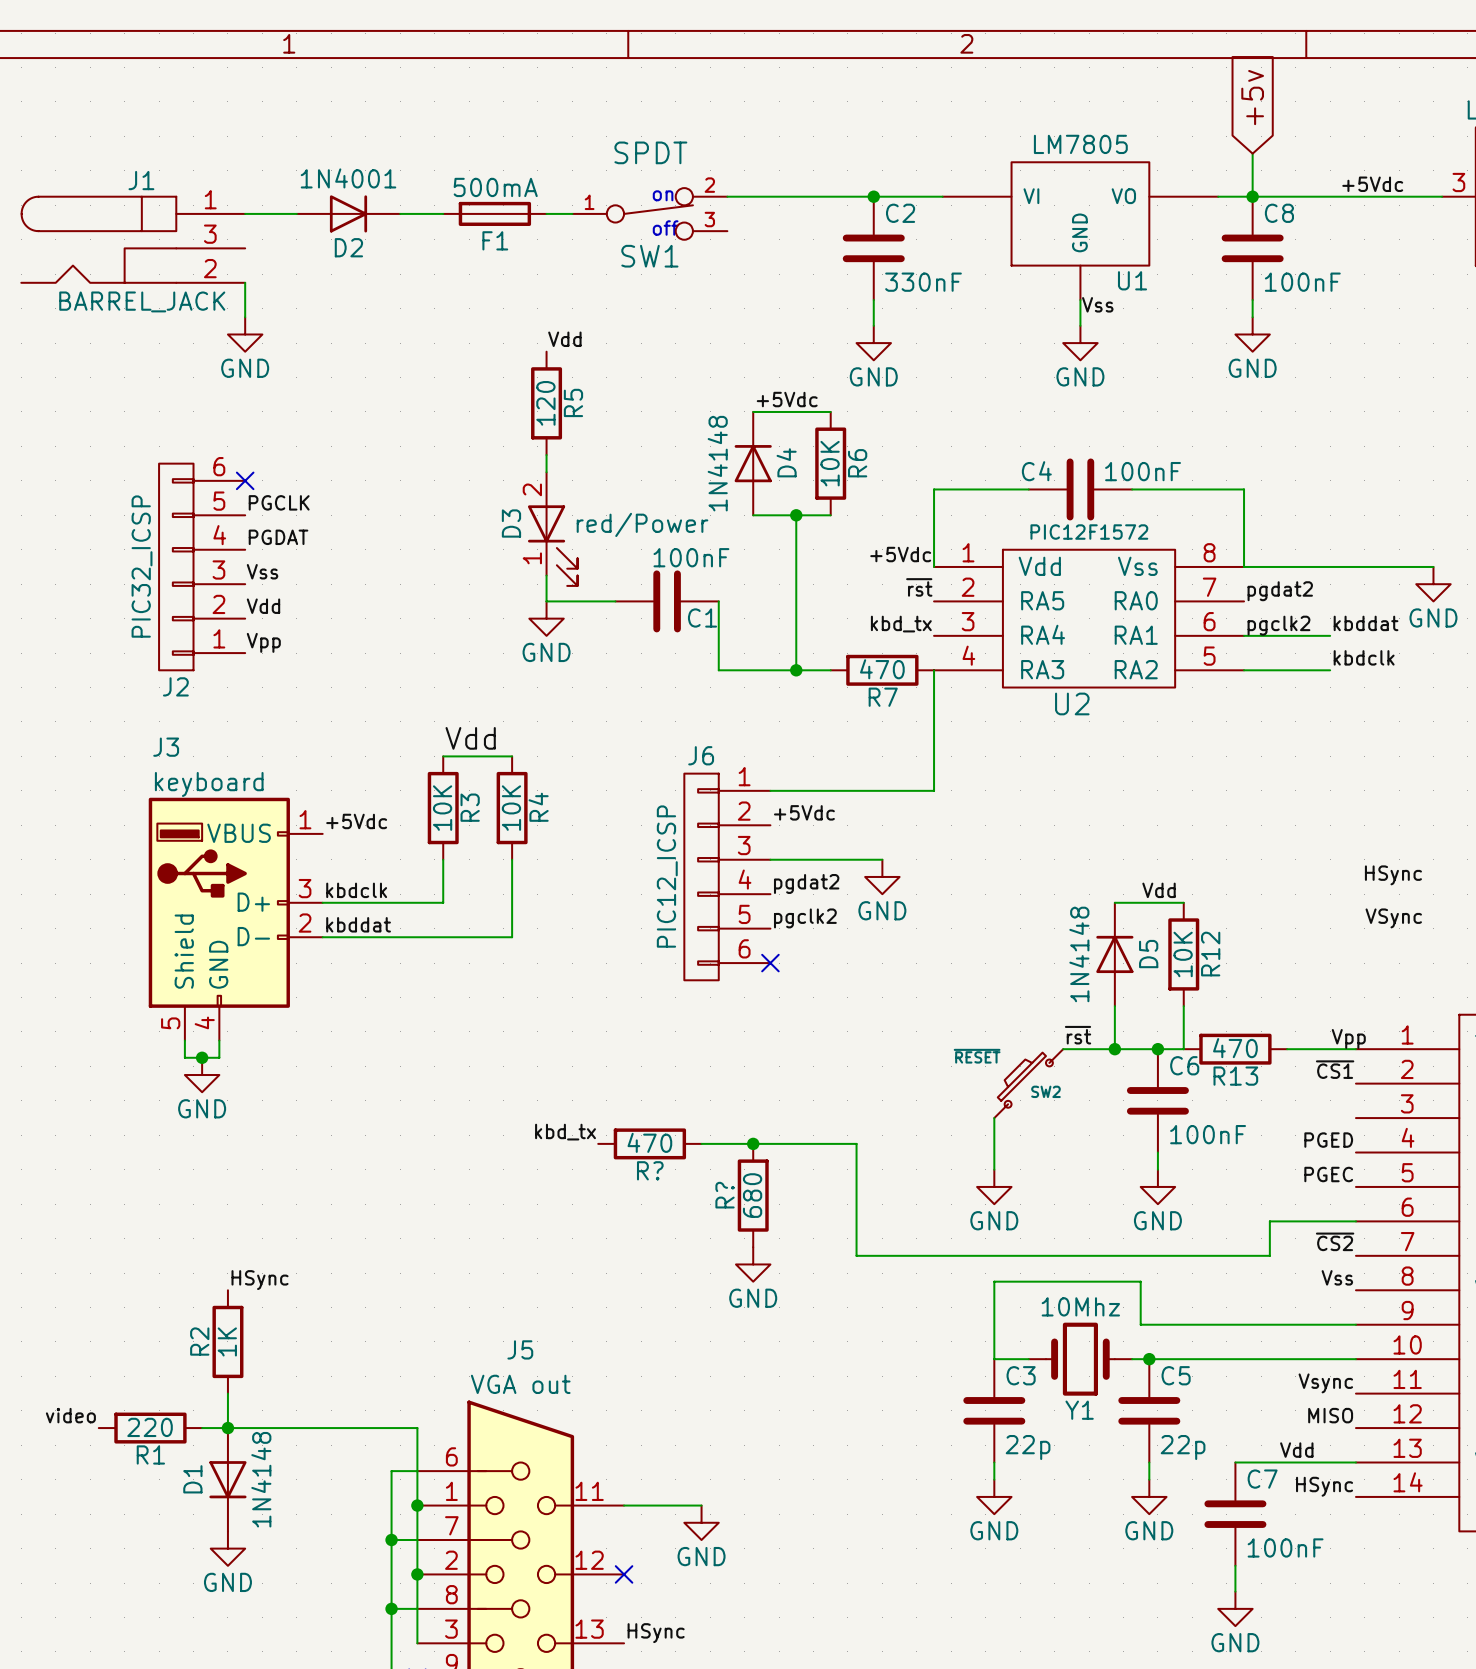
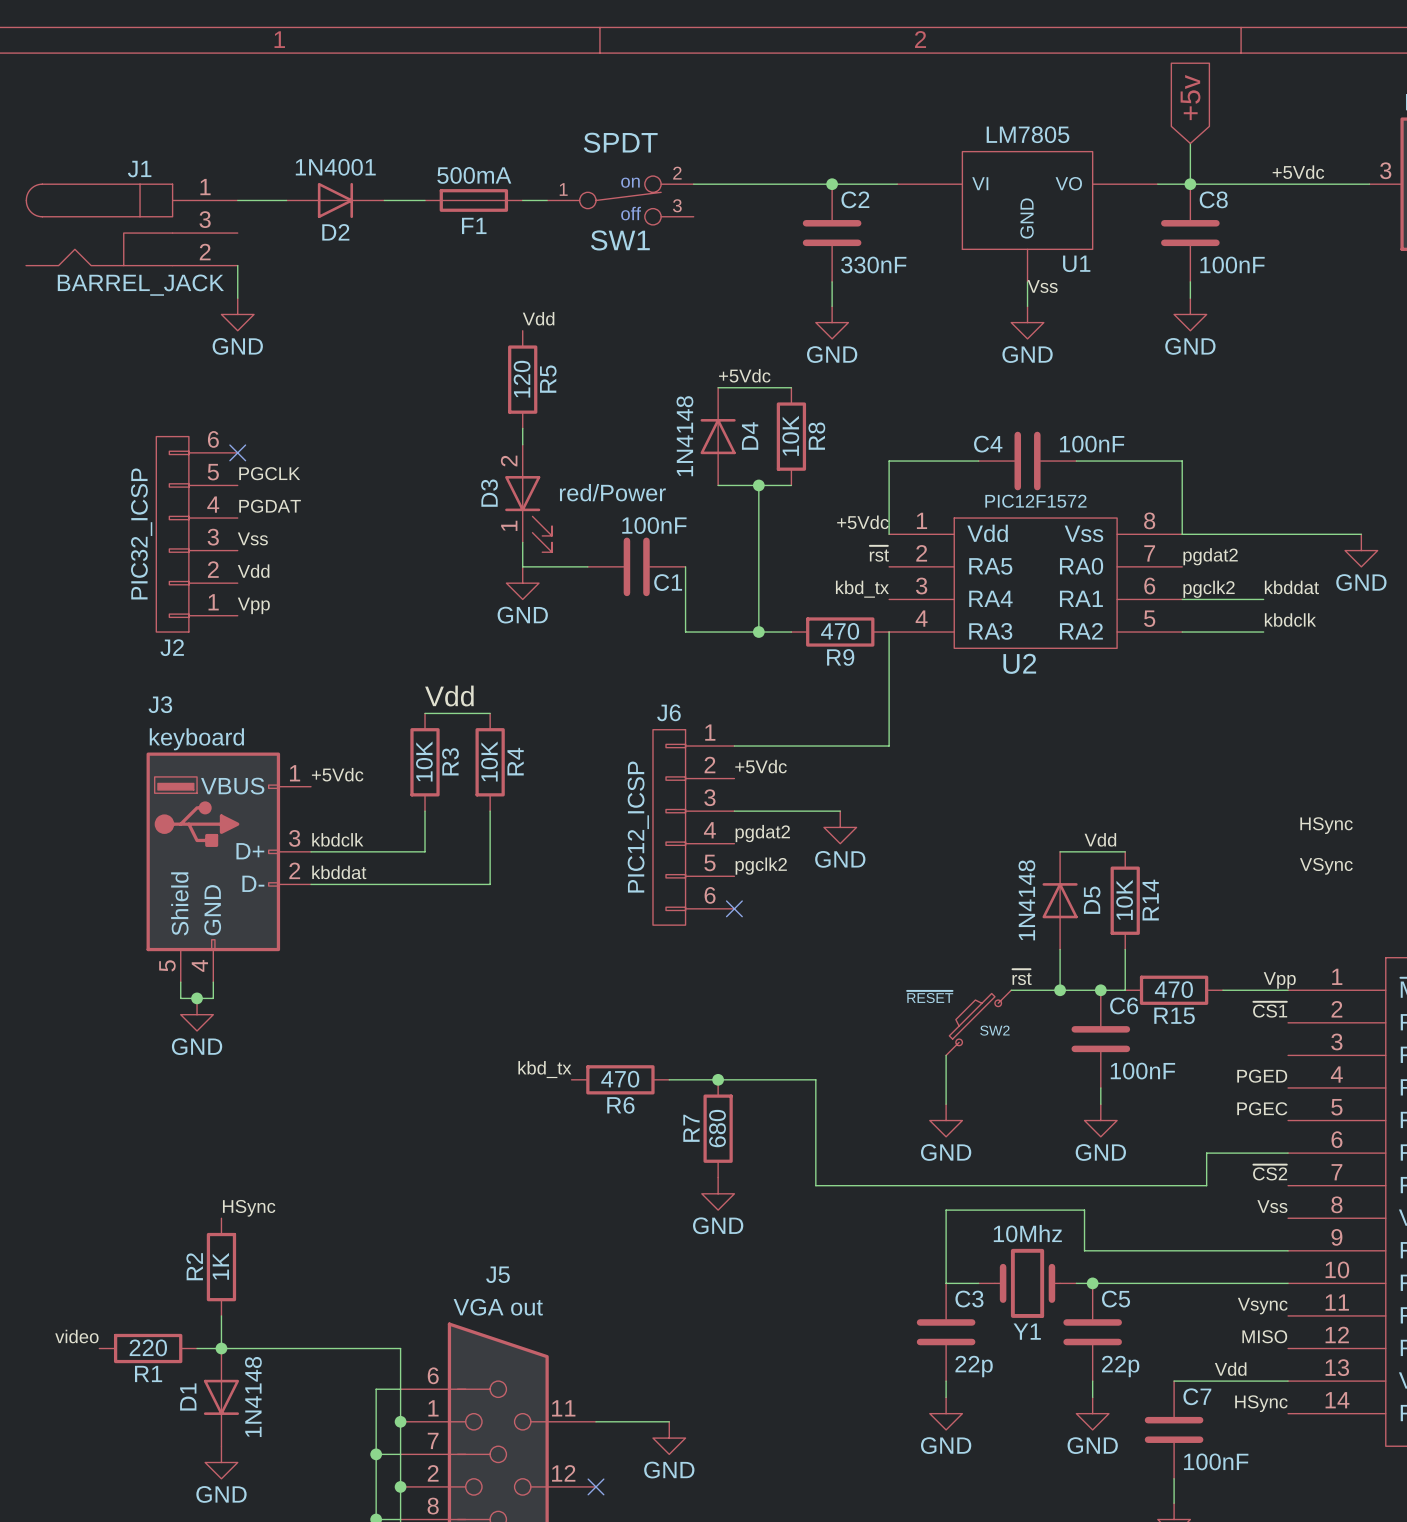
R6 name: R6 (857, 463) -> R8 (816, 436)
R7 name: R7 (883, 697) -> R9 (840, 657)
R12 name: R12 (1210, 954) -> R14 (1150, 900)
R13 name: R13 (1235, 1076) -> R15 (1174, 1015)
R? name: R? (650, 1170) -> R6 (620, 1105)
R? name: R? (725, 1195) -> R7 (691, 1128)

